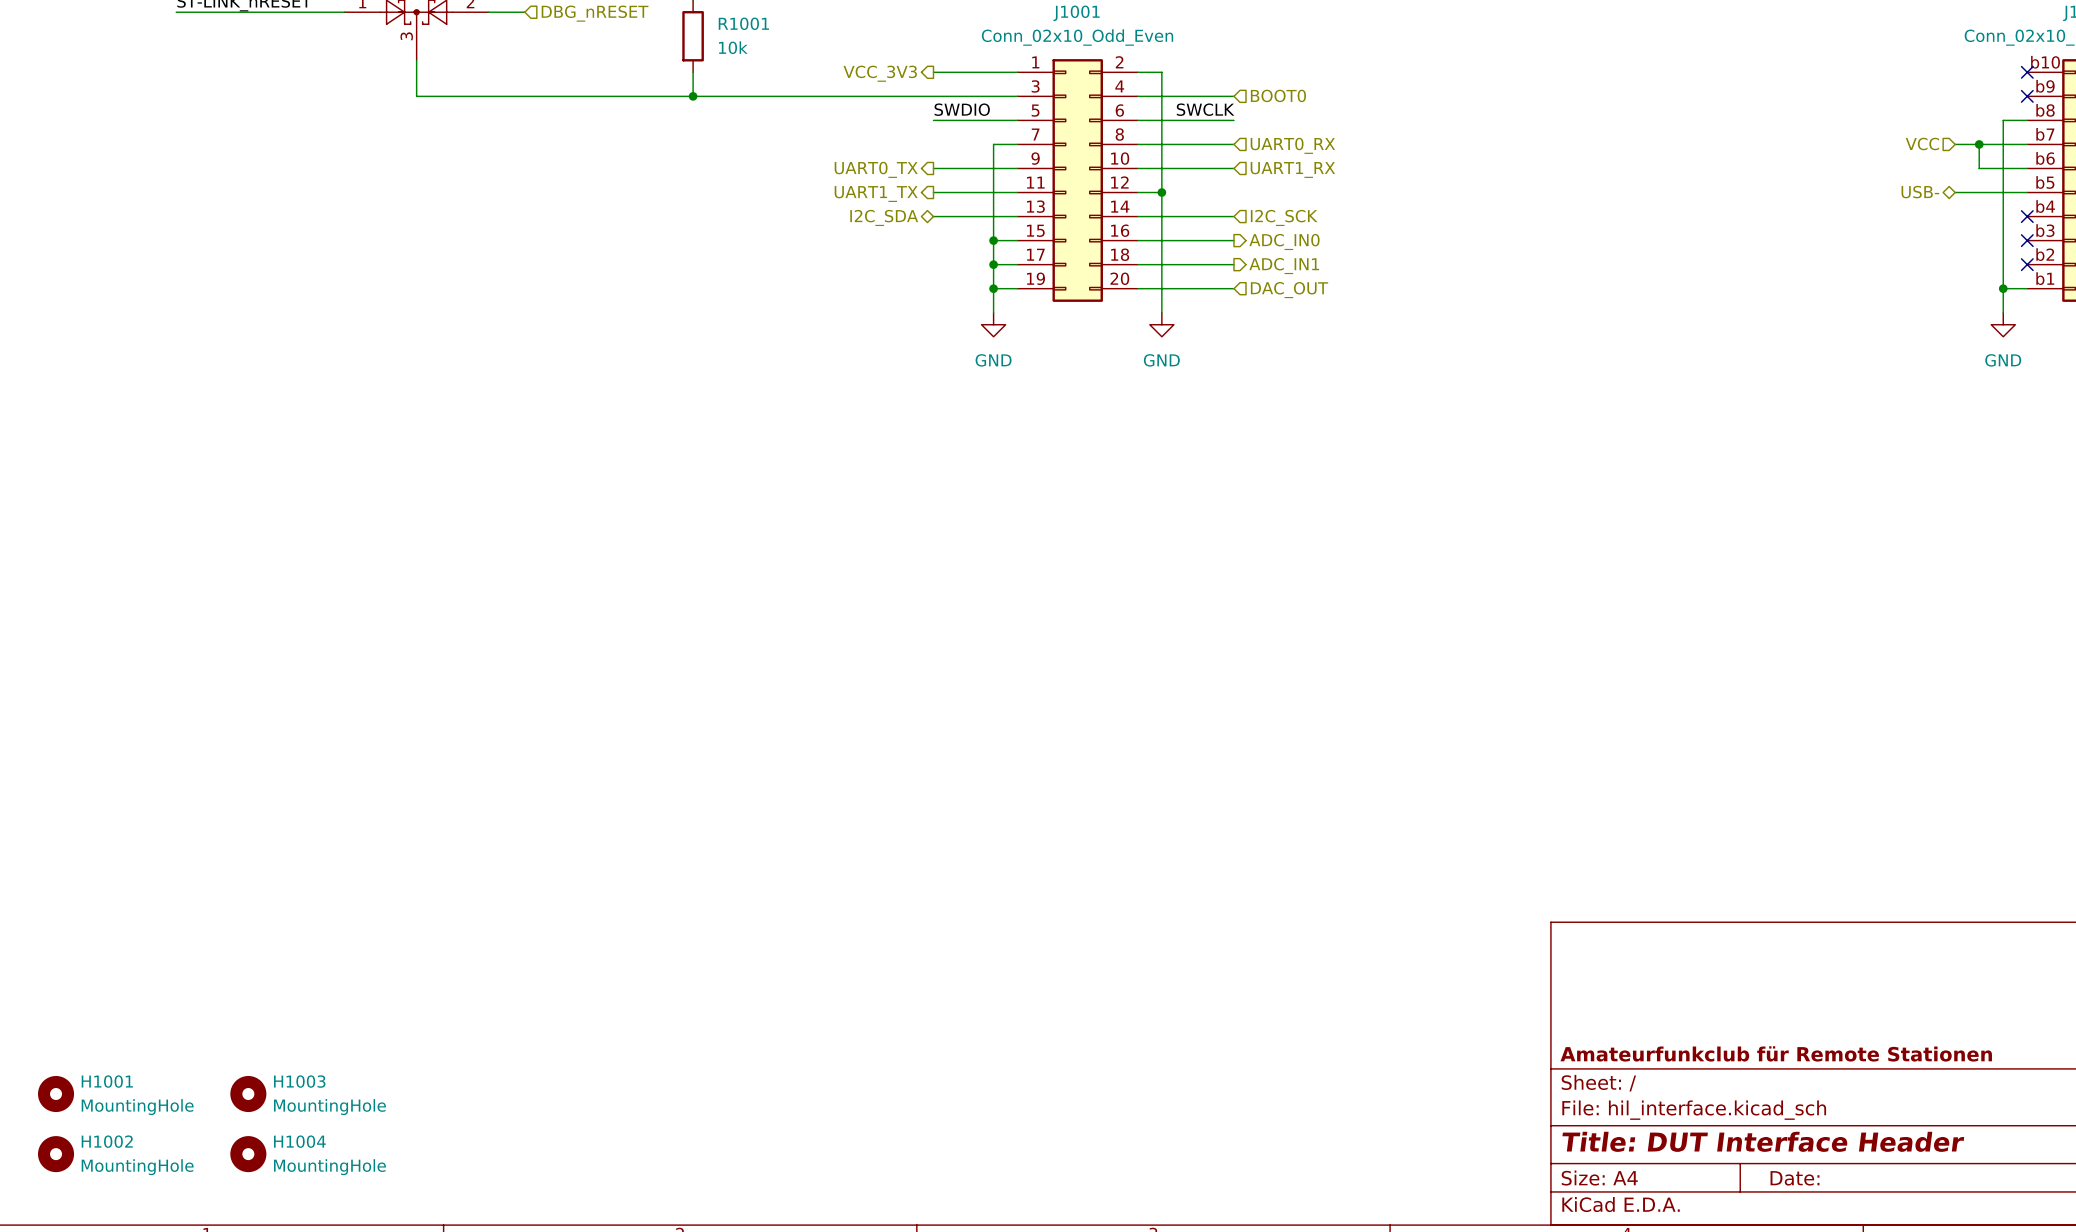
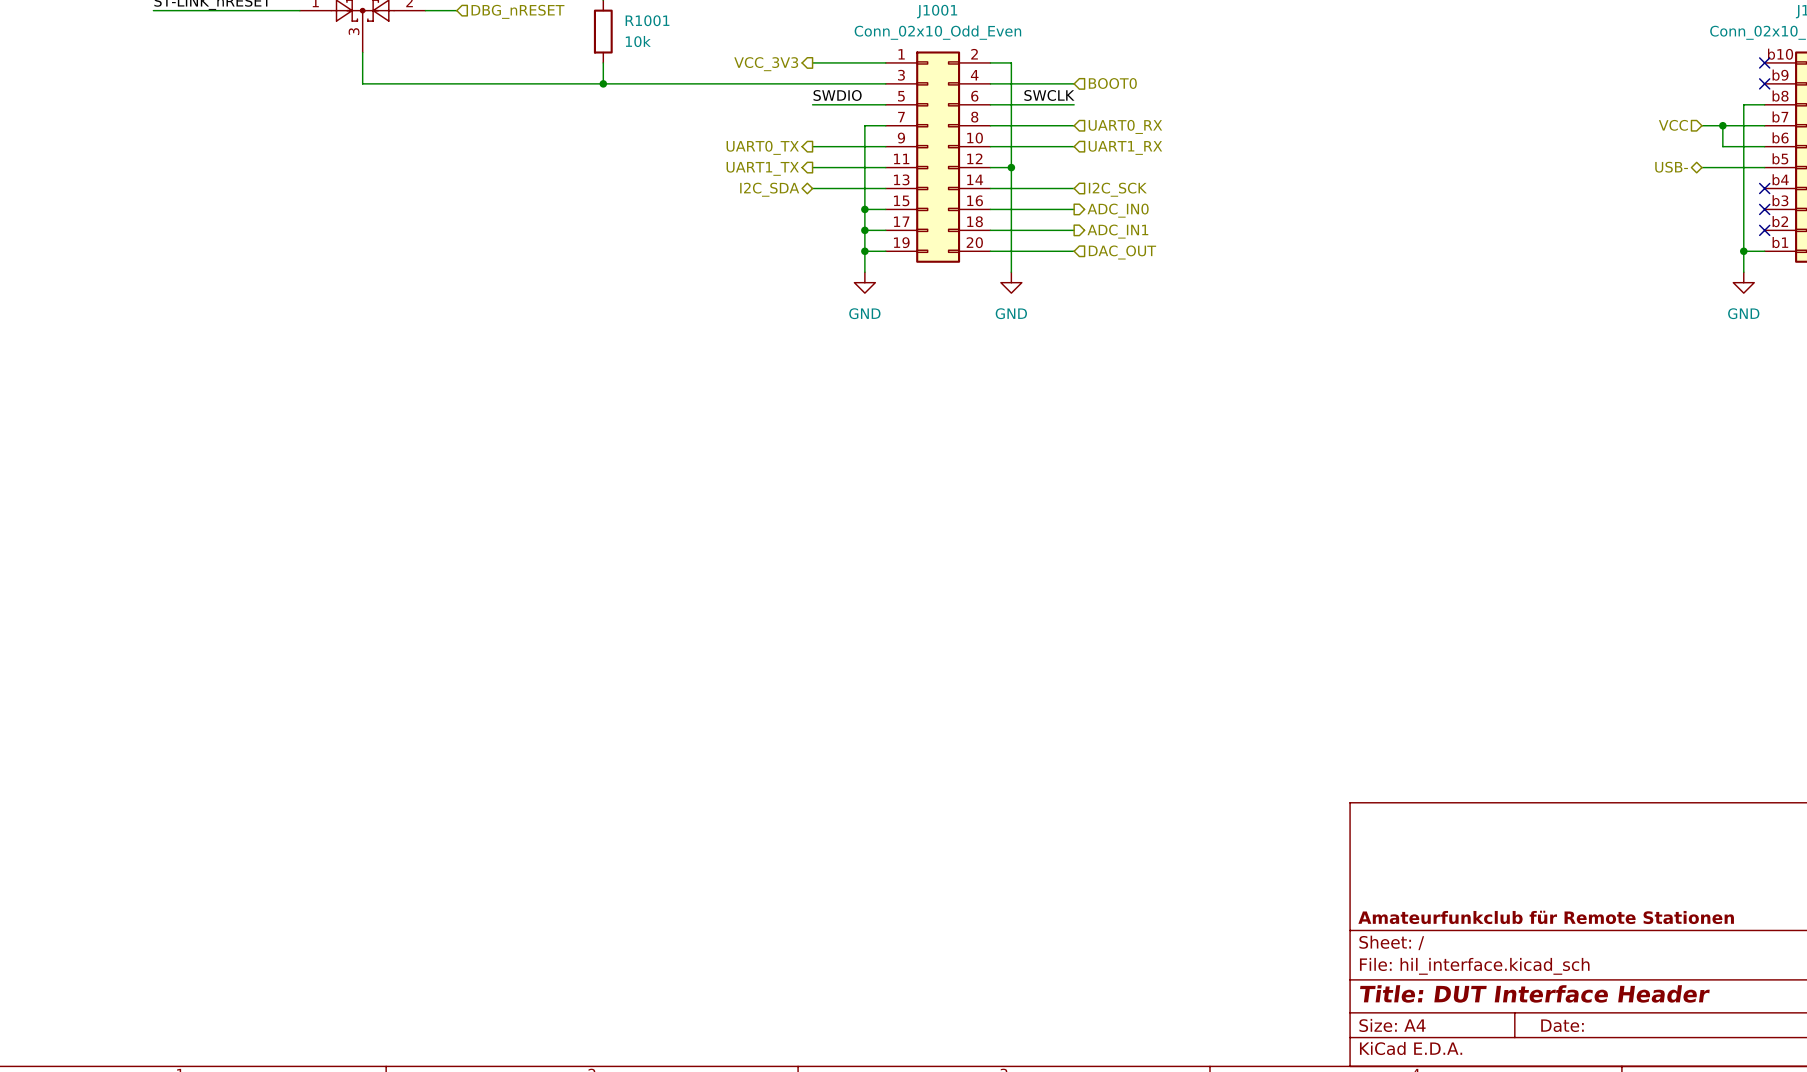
H1001: MountingHole (56, 1094) -> none
H1003: MountingHole (248, 1094) -> none
H1002: MountingHole (56, 1154) -> none
H1004: MountingHole (248, 1154) -> none

